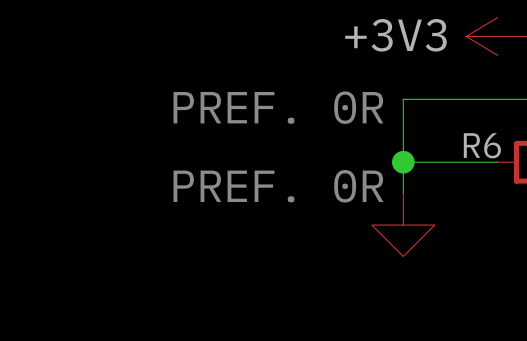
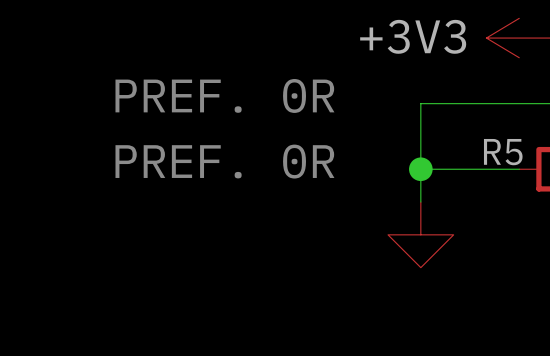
text: none -> PREF. 0R (224, 95)
text: PREF. 0R (278, 107) -> none
R6 name: R6 (482, 145) -> R5 (503, 152)
text: none -> PREF. 0R (224, 161)
text: PREF. 0R (278, 186) -> none

